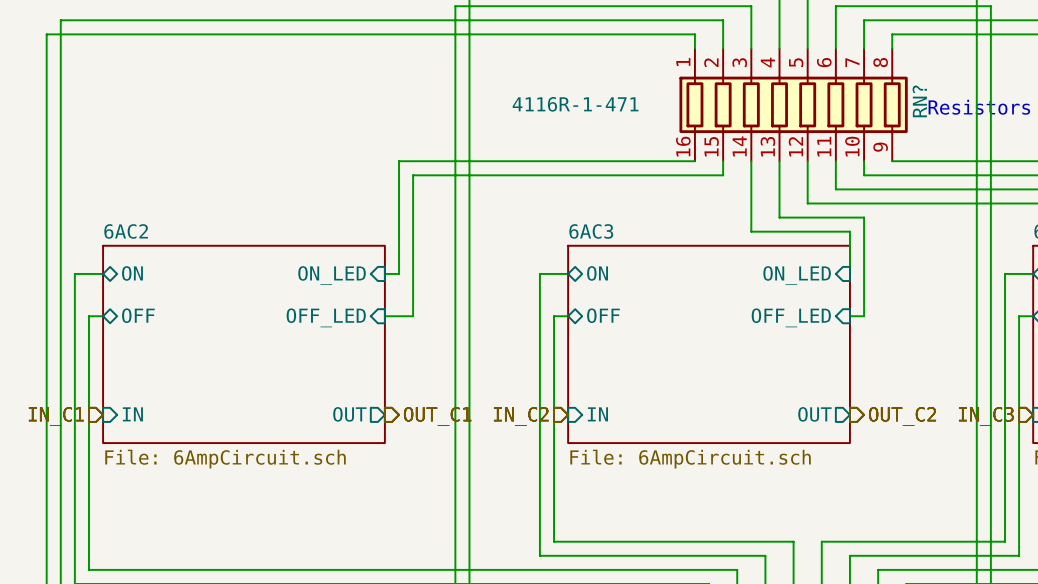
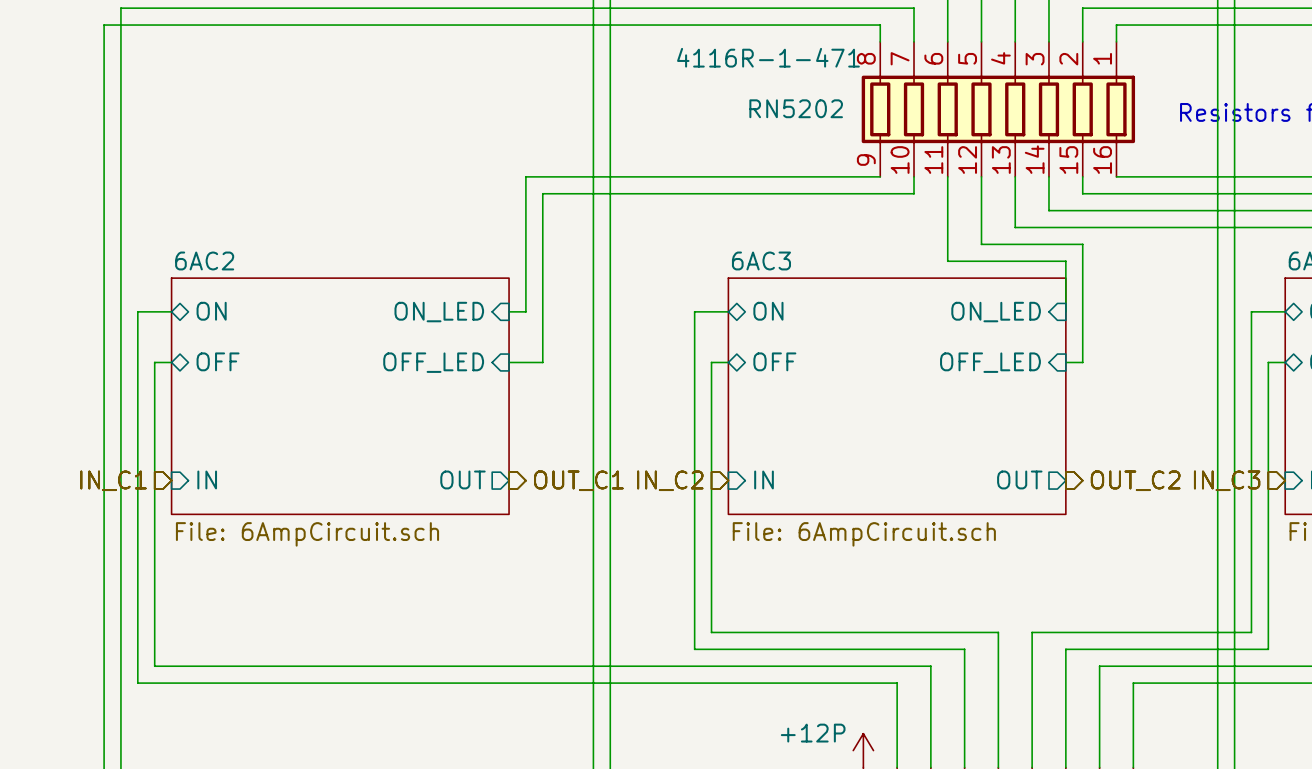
RN? name: RN? (919, 101) -> RN5202 (796, 108)
RN? value position: 4116R-1-471 (575, 104) -> 4116R-1-471 (768, 57)
RN? flip: as is (793, 104) -> left-right (998, 109)

